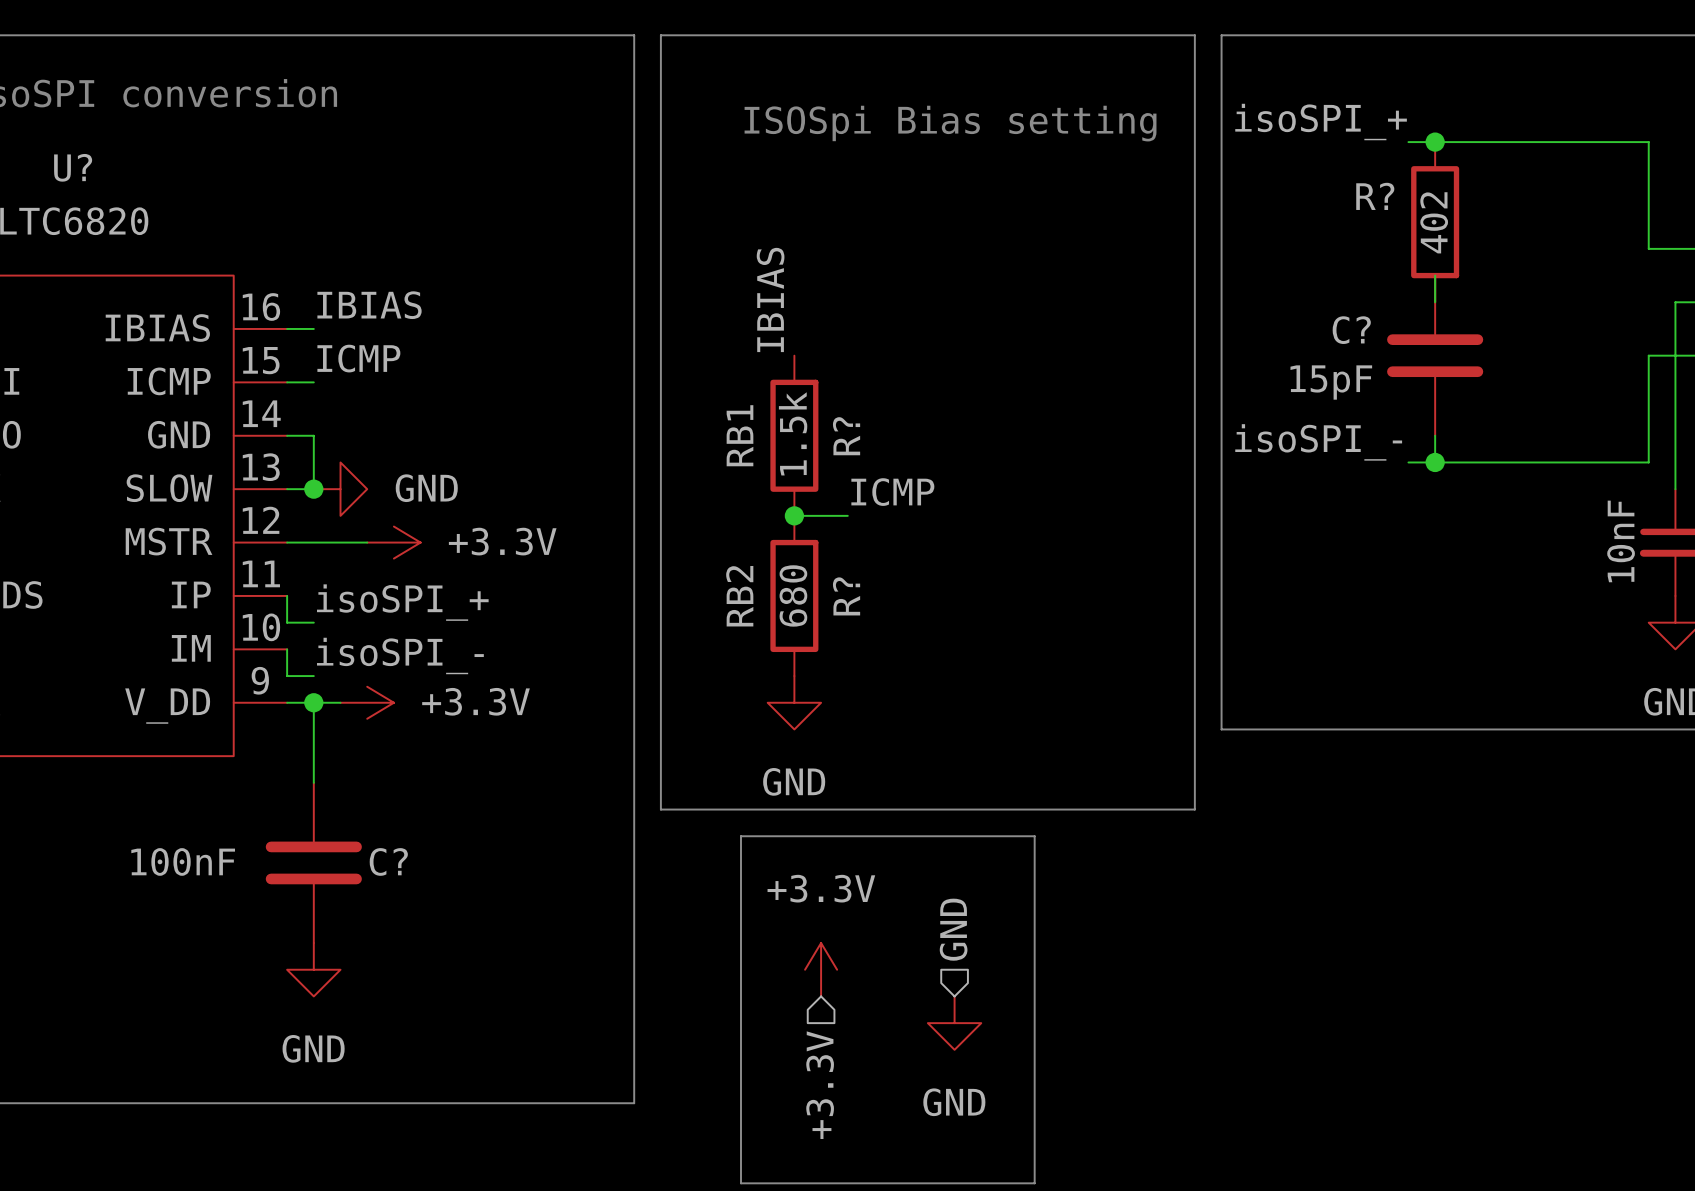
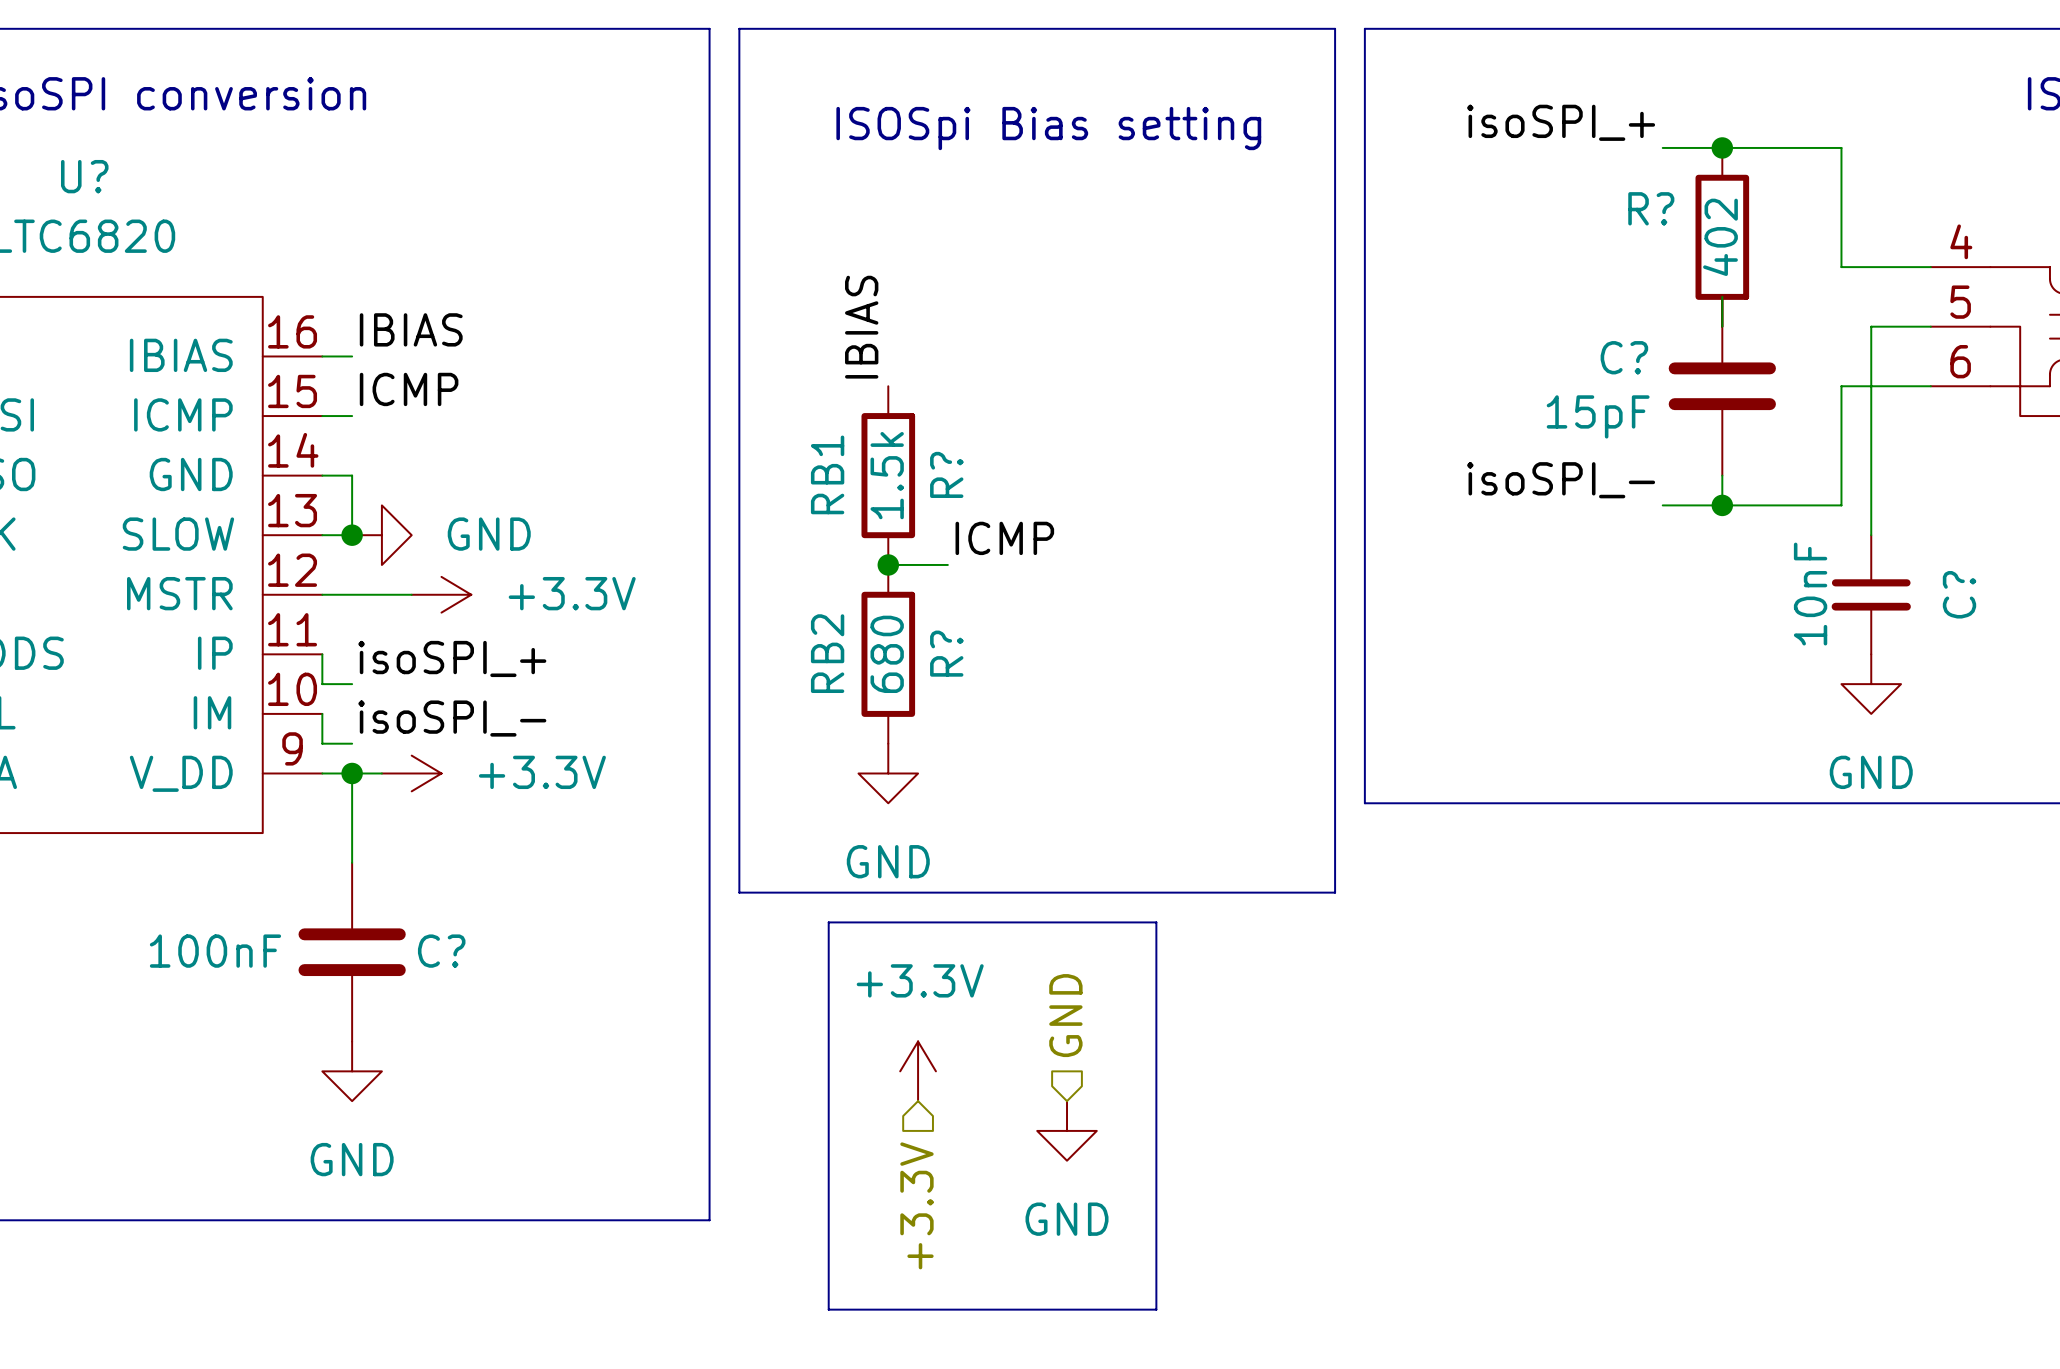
label position: isoSPI_+ (1321, 122) -> isoSPI_+ (1561, 122)
wire: (1408, 142) (1488, 142) -> none
junction position: (1435, 142) -> (1722, 147)
R? position: (1435, 222) -> (1722, 237)
wire: (1435, 275) (1435, 302) -> (1722, 296) (1722, 326)
C? position: (1435, 355) -> (1722, 386)
wire: (1435, 435) (1435, 462) -> (1722, 475) (1722, 505)
label position: isoSPI_- (1318, 442) -> isoSPI_- (1561, 480)
wire: (1408, 462) (1488, 462) -> none
junction position: (1435, 462) -> (1722, 505)

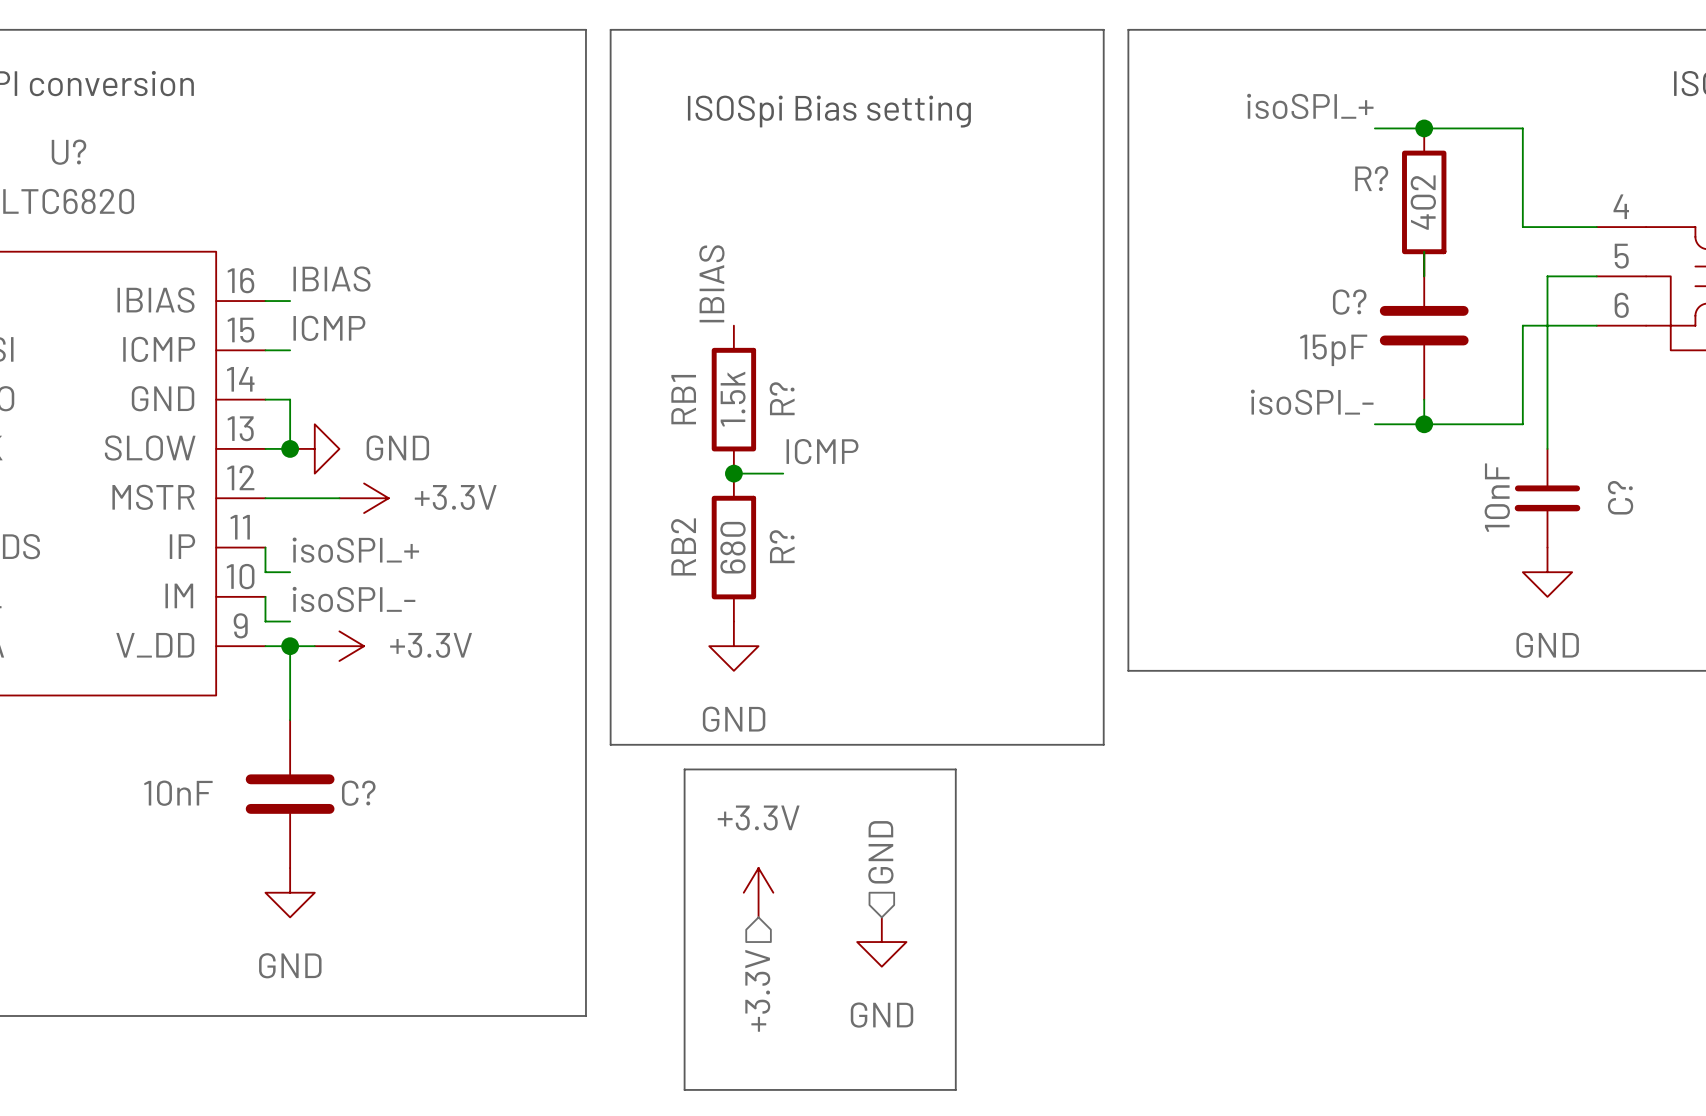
C? value: 100nF (215, 951) -> 10nF (178, 793)

